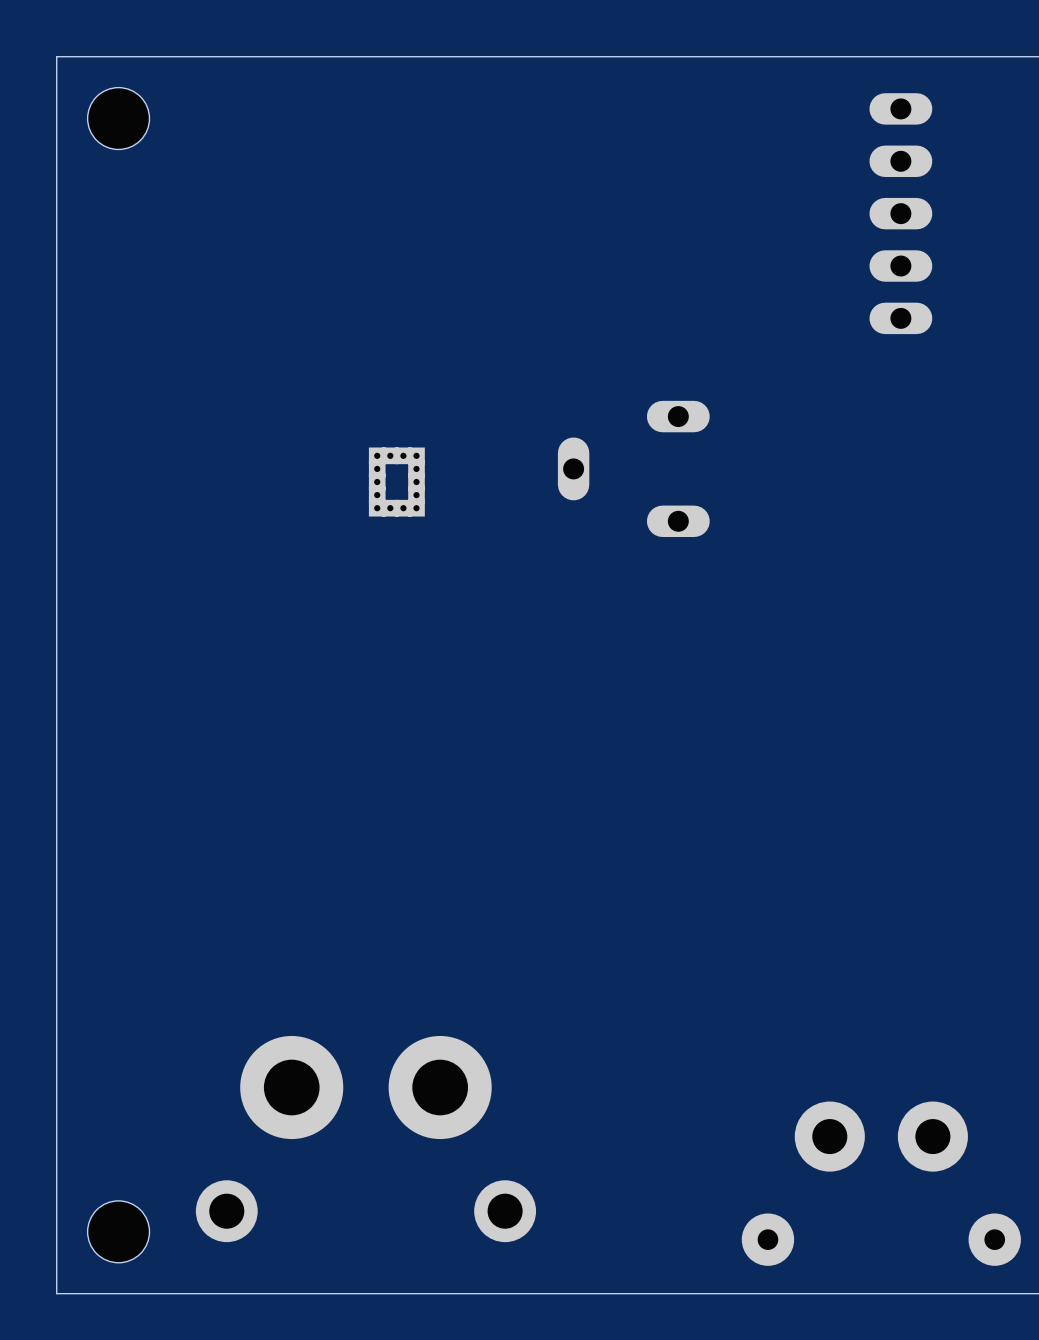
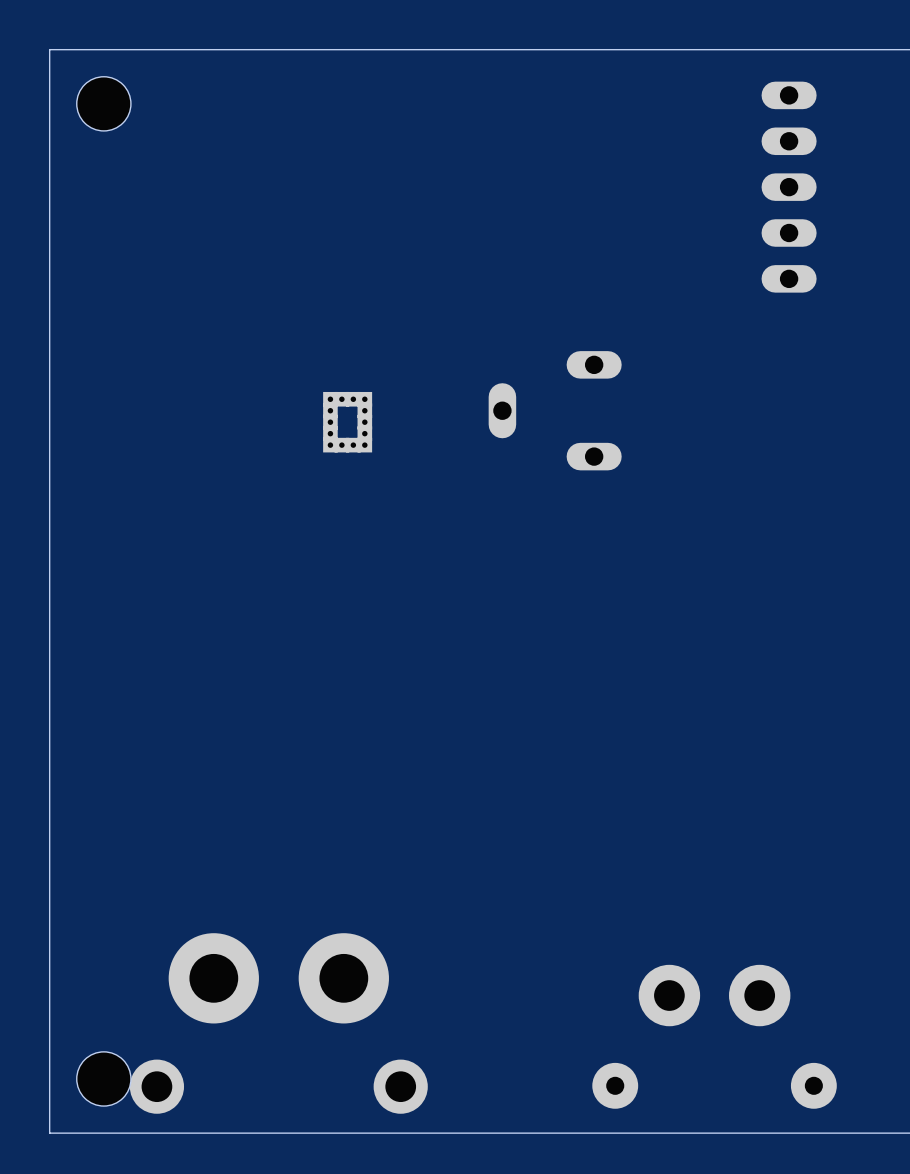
part position: (365, 1139) -> (278, 1023)
part position: (881, 1183) -> (714, 1036)

